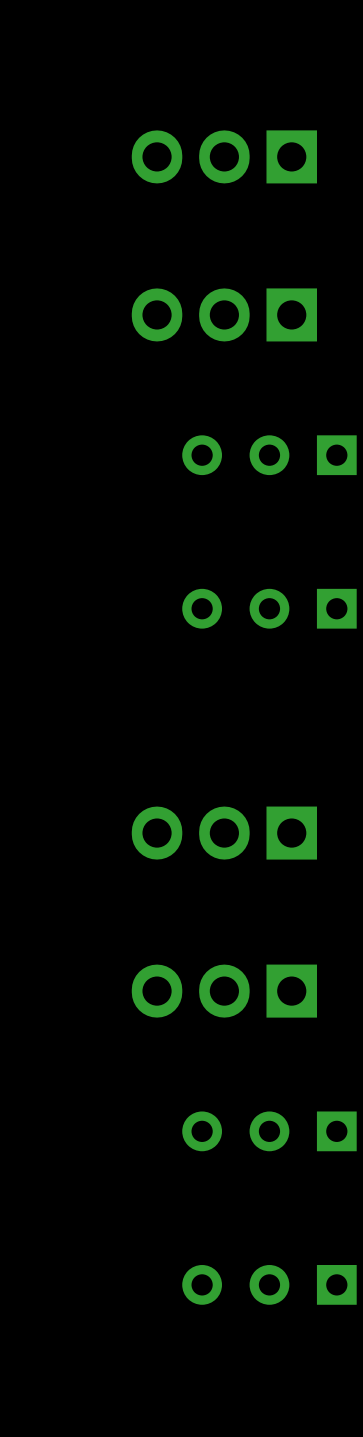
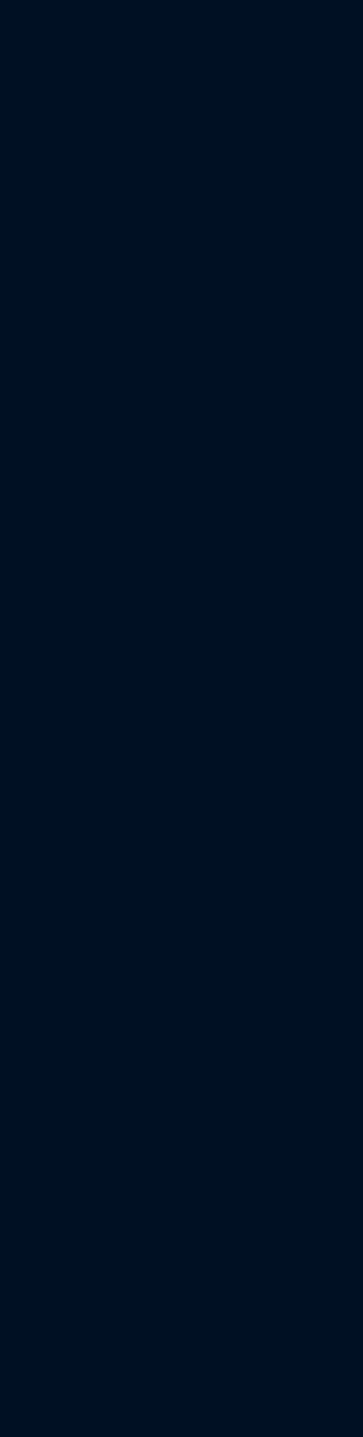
part: (224, 156) -> none
part: (224, 314) -> none
part: (269, 455) -> none
part: (269, 608) -> none
part: (224, 833) -> none
part: (224, 991) -> none
part: (269, 1131) -> none
part: (269, 1284) -> none

